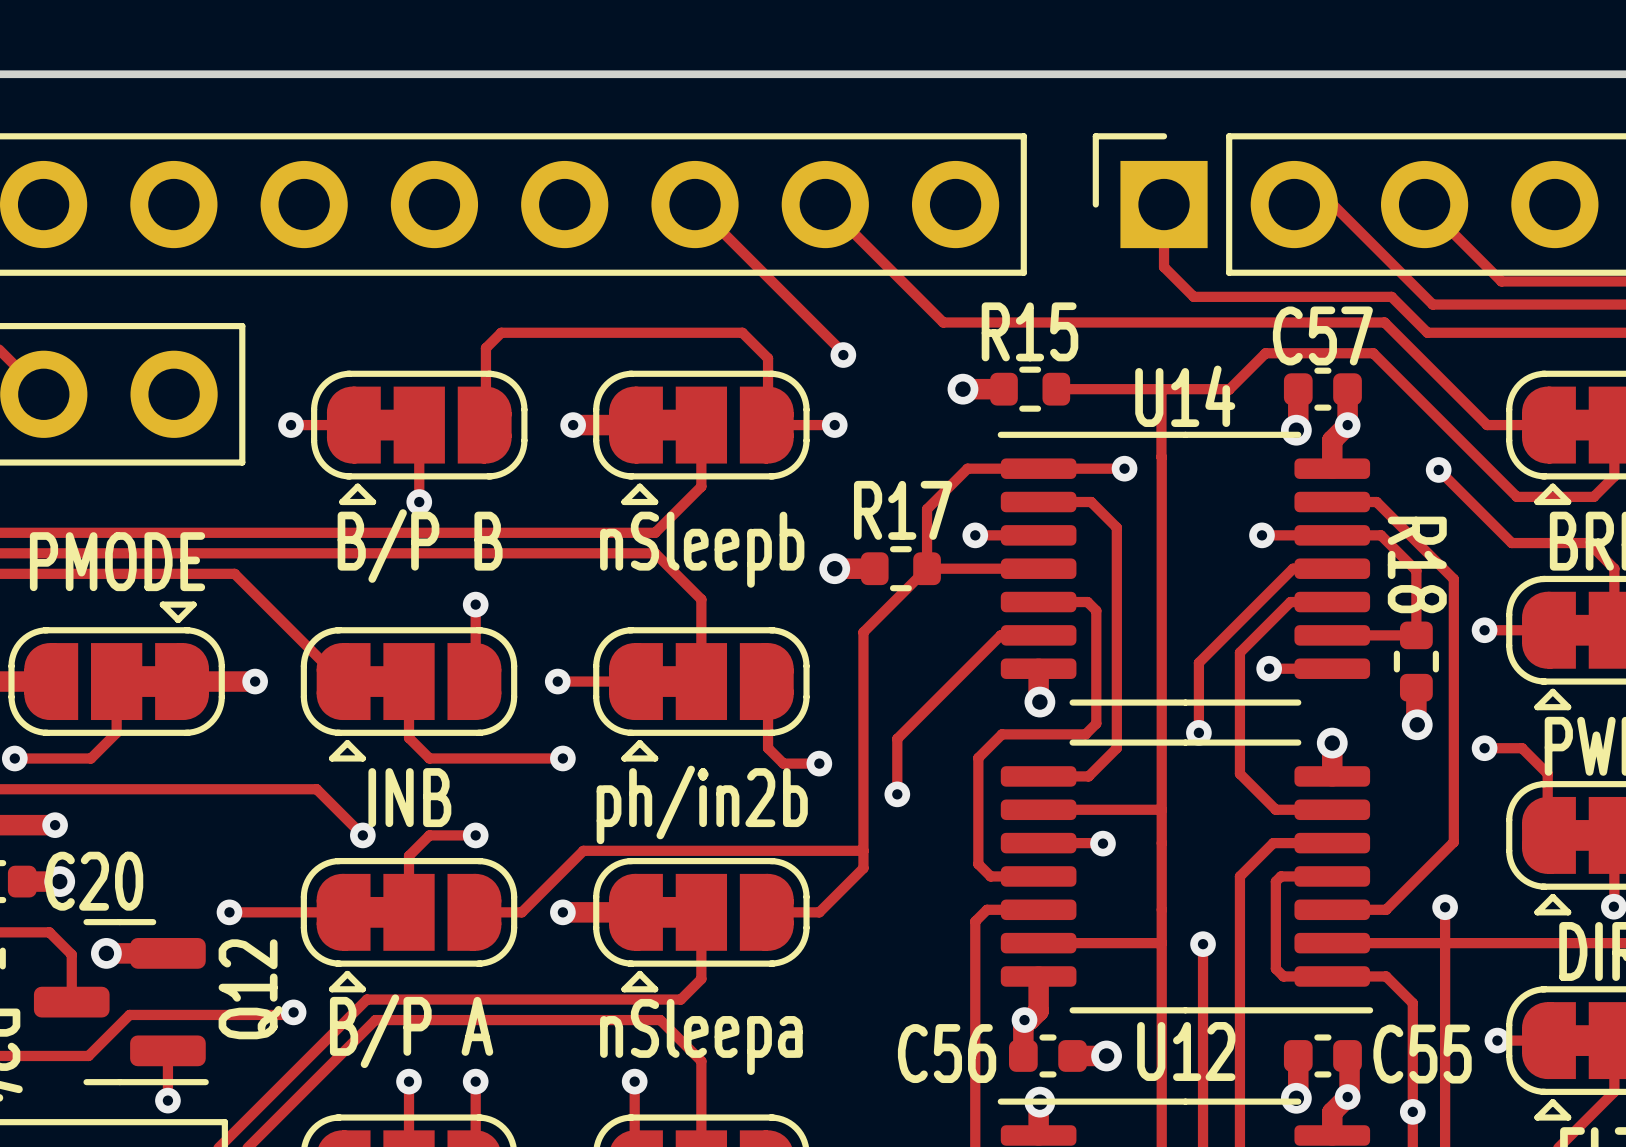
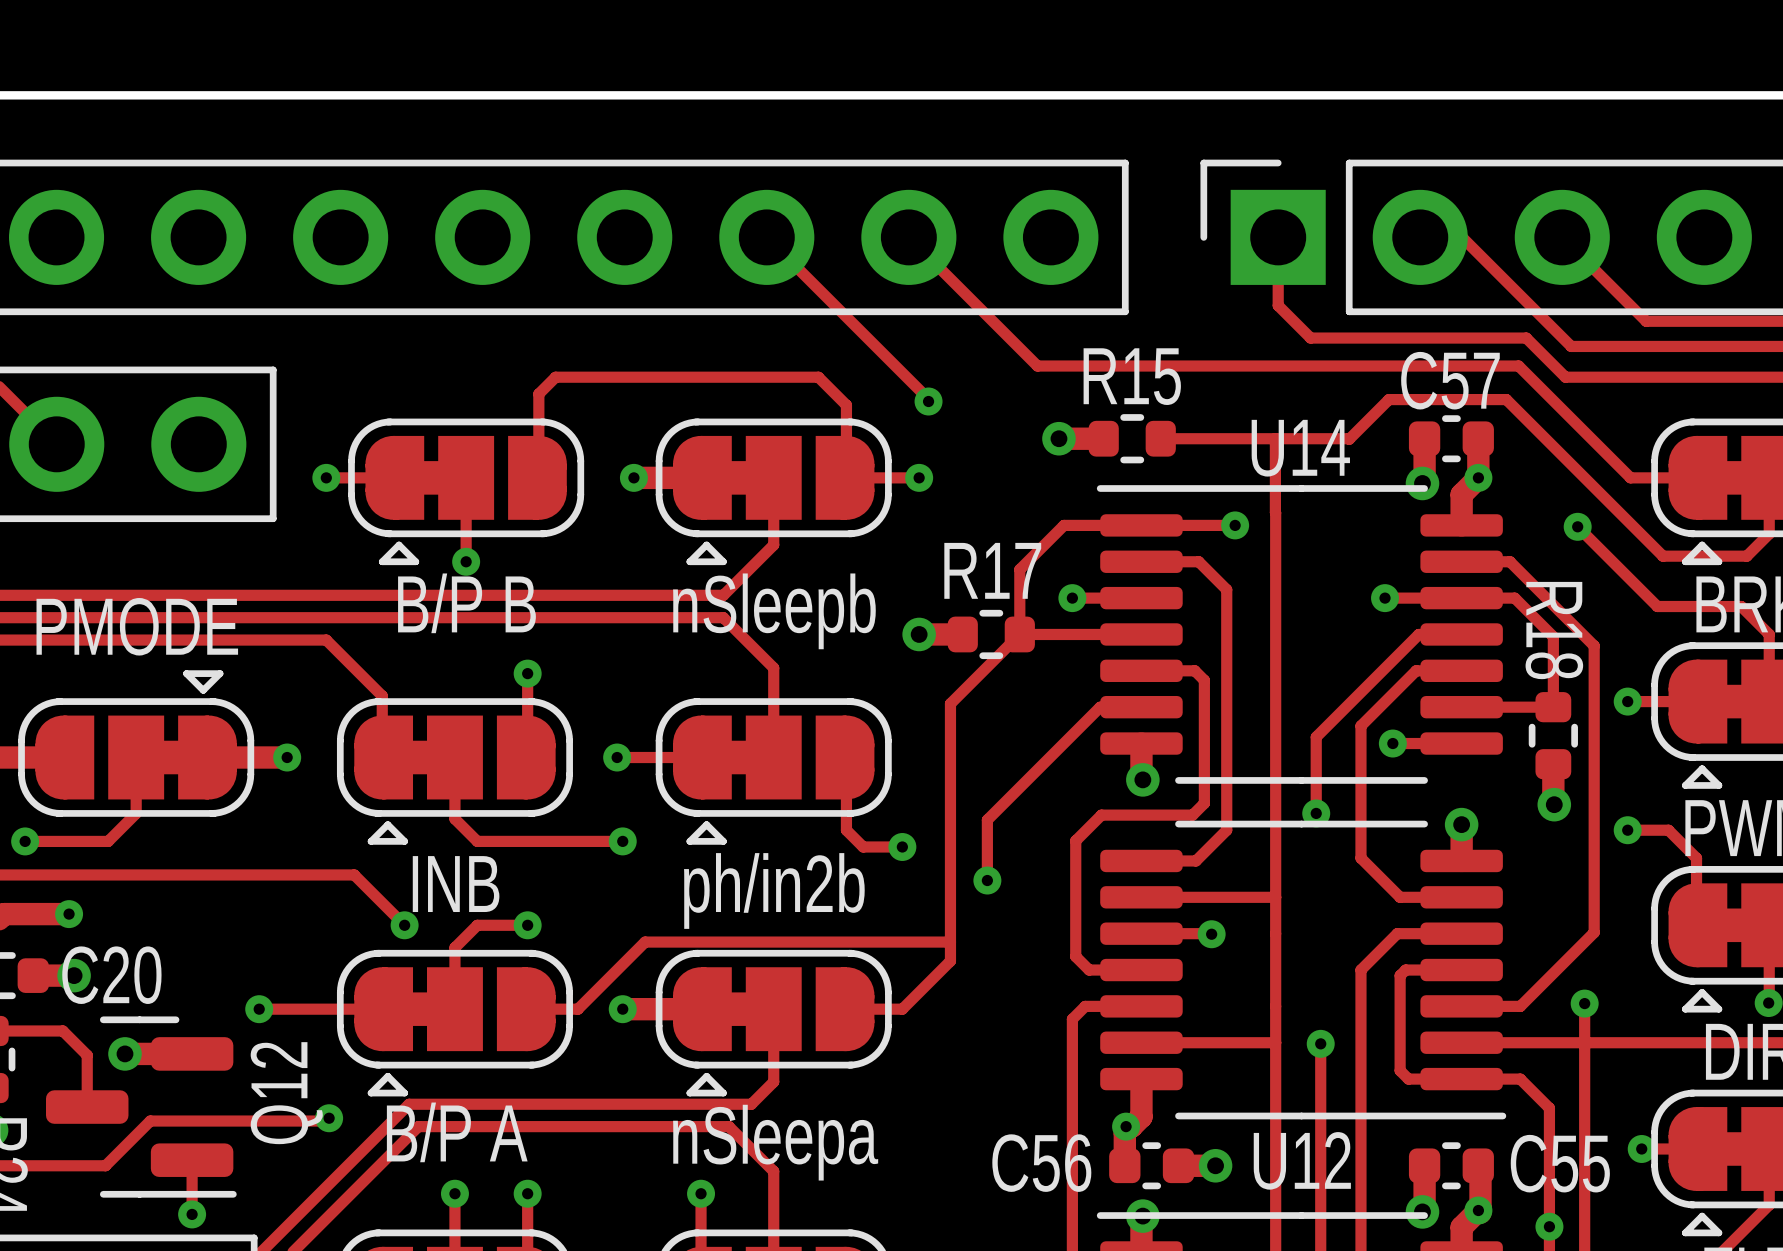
track: (234, 573) (342, 681) -> (264, 640) (326, 640) (382, 695) (382, 757)

